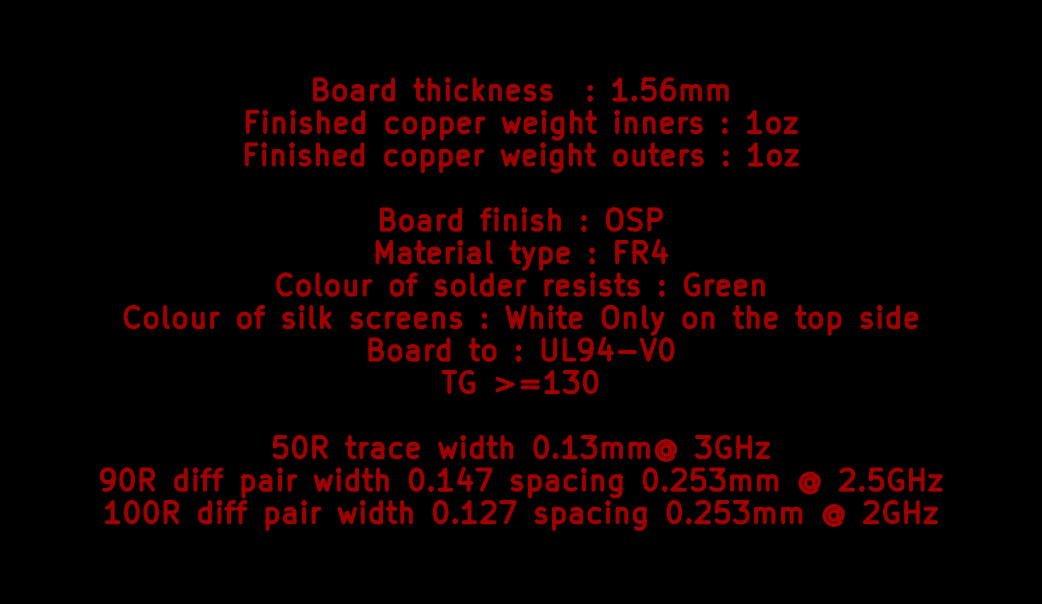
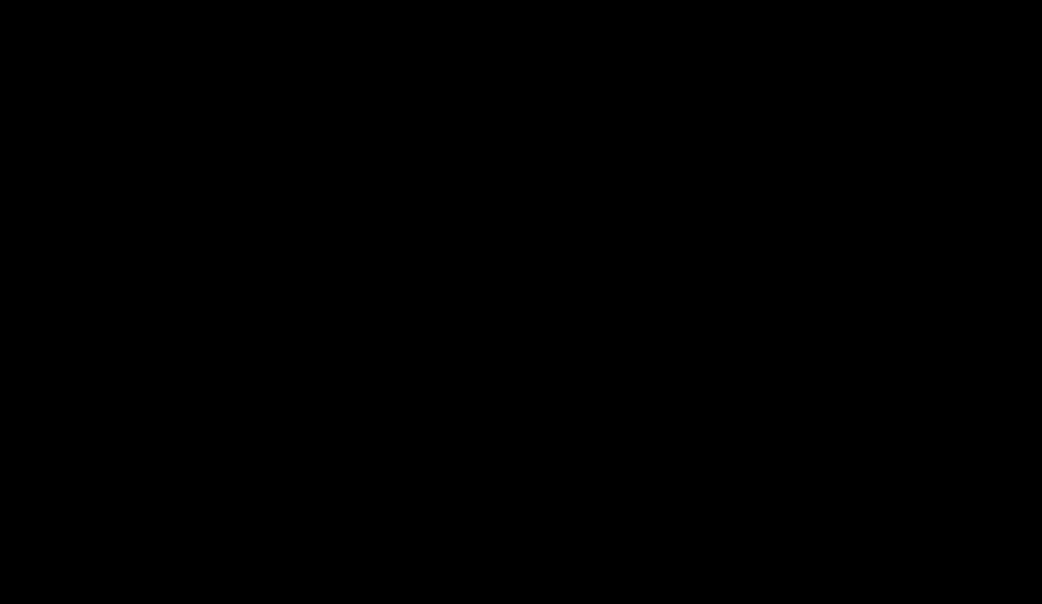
text: Board thickness : 1.56mm (520, 89) -> none
text: Finished copper weight inners : 1oz (521, 125) -> none
text: Finished copper weight outers : 1oz (521, 157) -> none
text: Board finish : OSP (521, 219) -> none
text: Material type : FR4 (521, 254) -> none
text: Colour of solder resists : Green (520, 284) -> none
text: Colour of silk screens : White Only on the top side (520, 320) -> none
text: Board to : UL94-V0 (521, 349) -> none
text: TG >=130 (520, 382) -> none
text: 50R trace width 0.13mm@ 3GHz (521, 448) -> none
text: 90R diff pair width 0.147 spacing 0.253mm @ 2.5GHz (521, 482) -> none
text: 100R diff pair width 0.127 spacing 0.253mm @ 2GHz (521, 515) -> none

